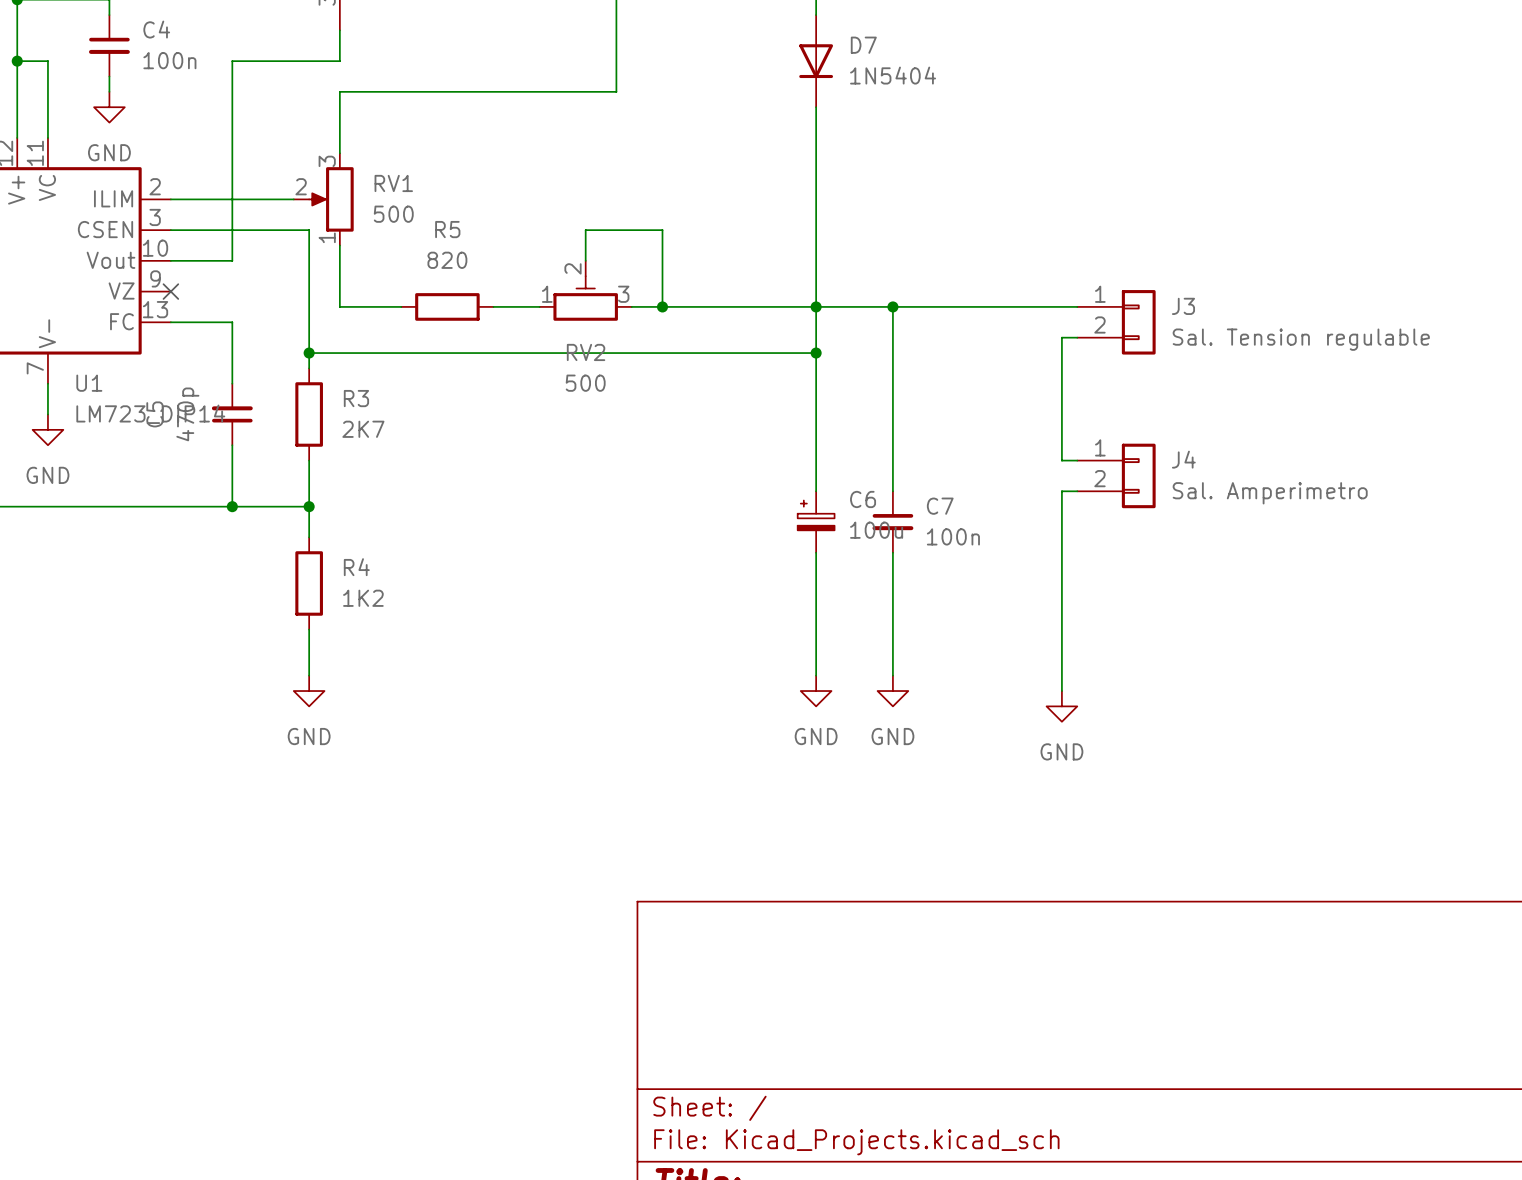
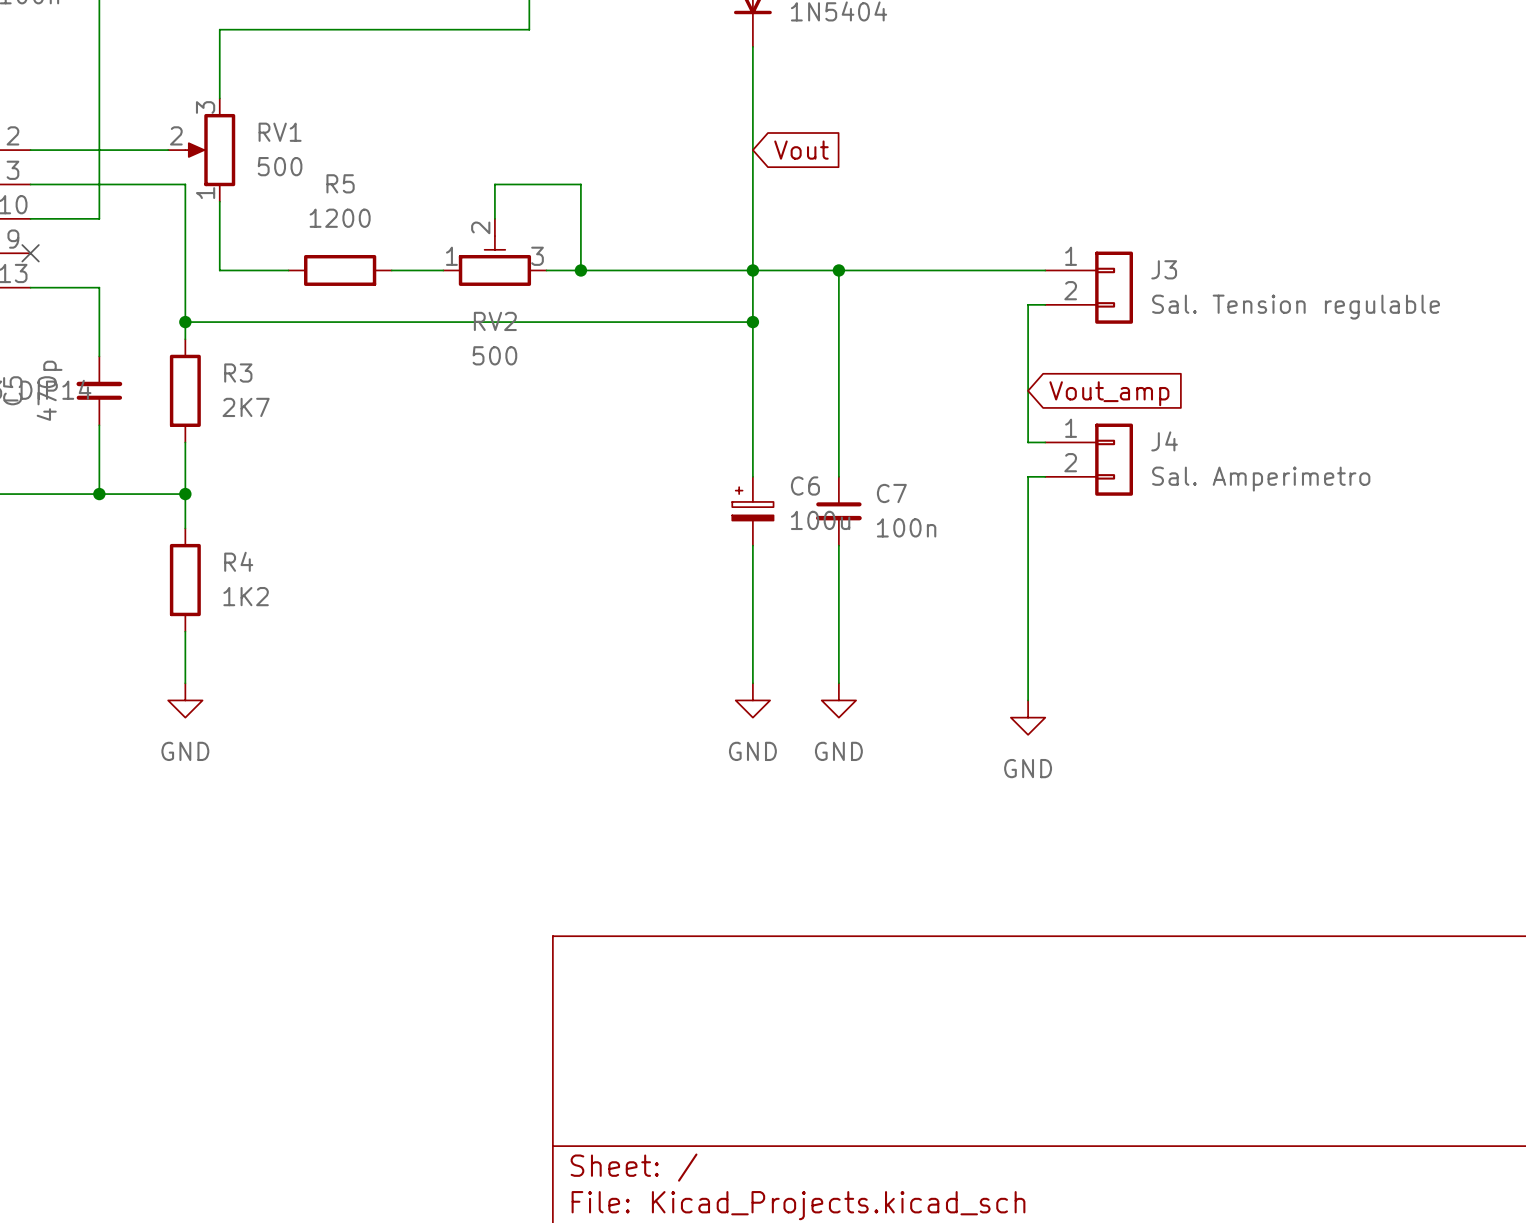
global label: none -> Vout (801, 150)
R5 value: 820 (447, 260) -> 1200 (340, 218)
global label: none -> Vout_amp (1109, 393)

